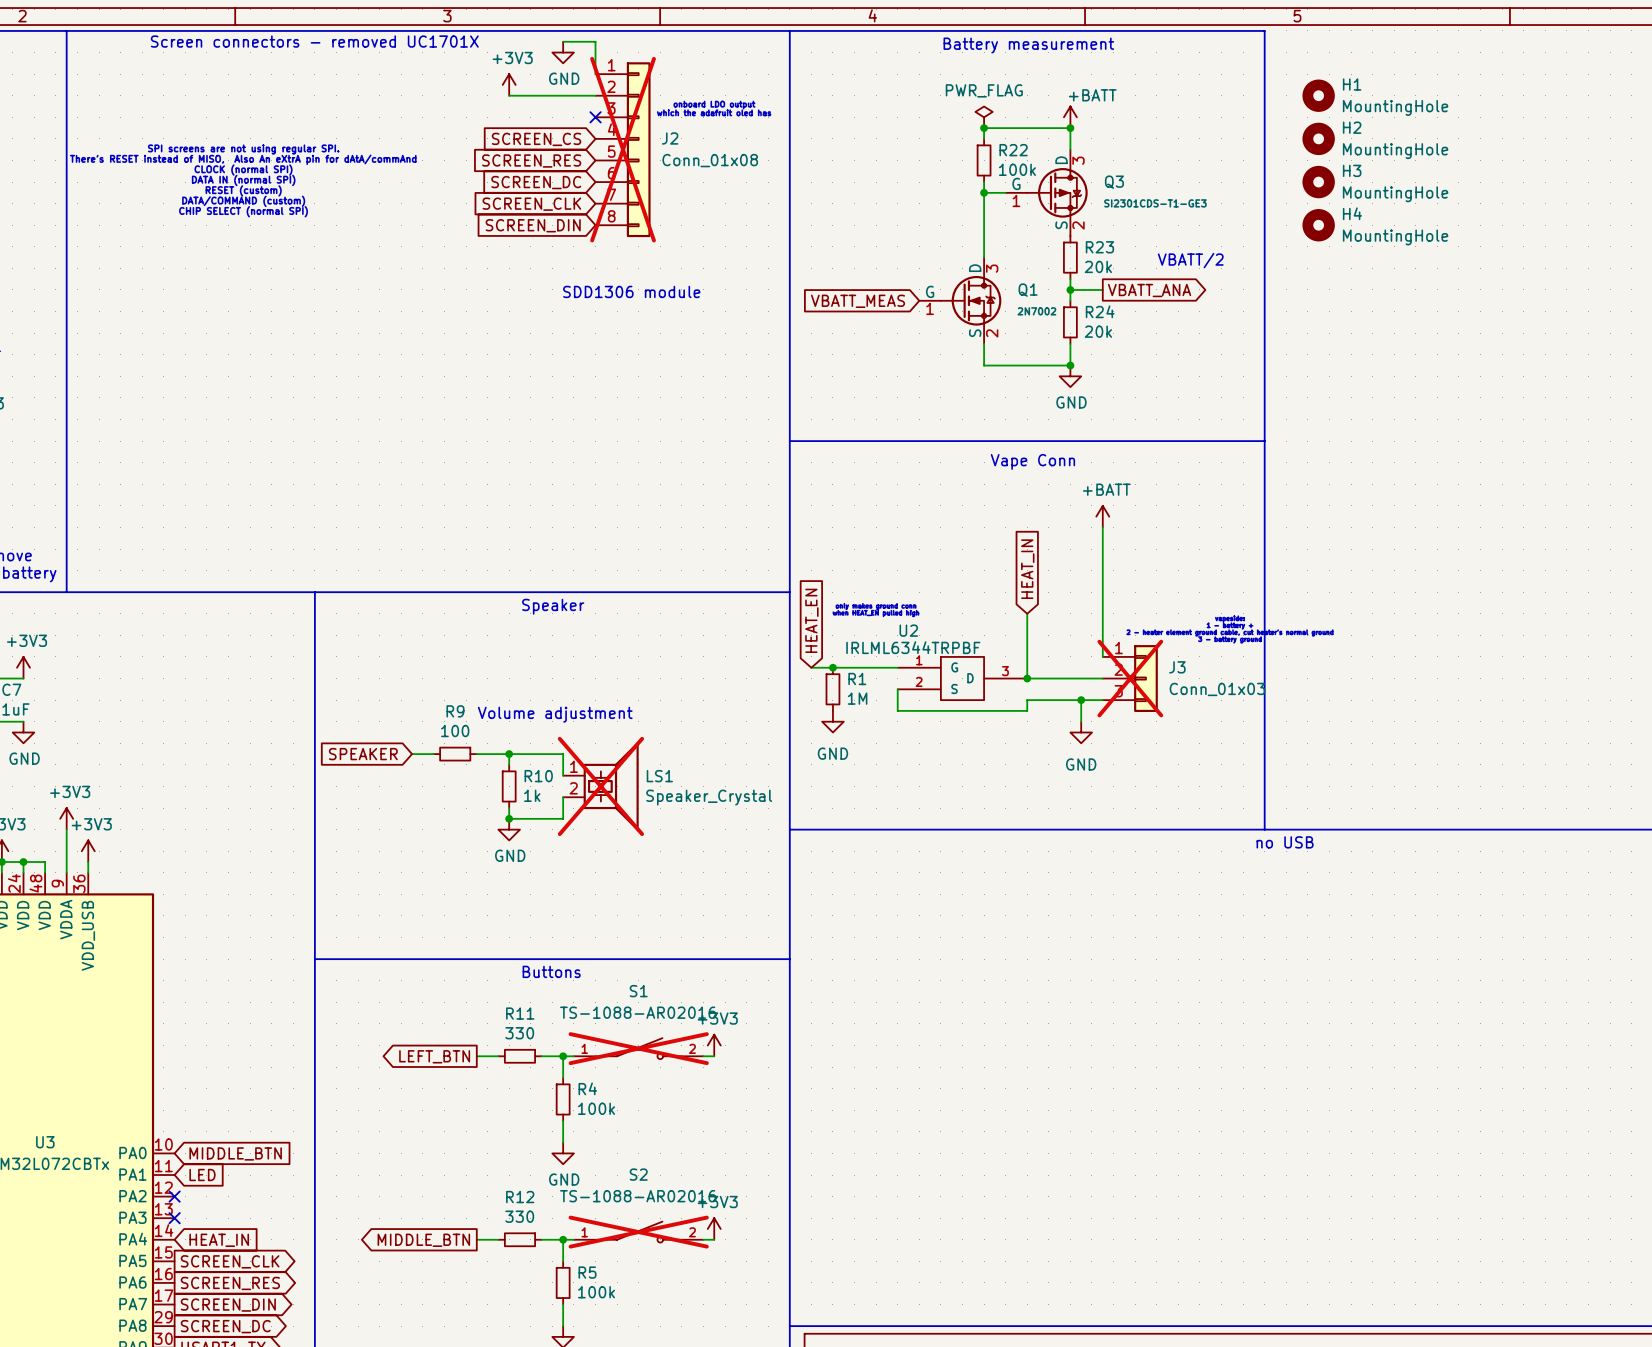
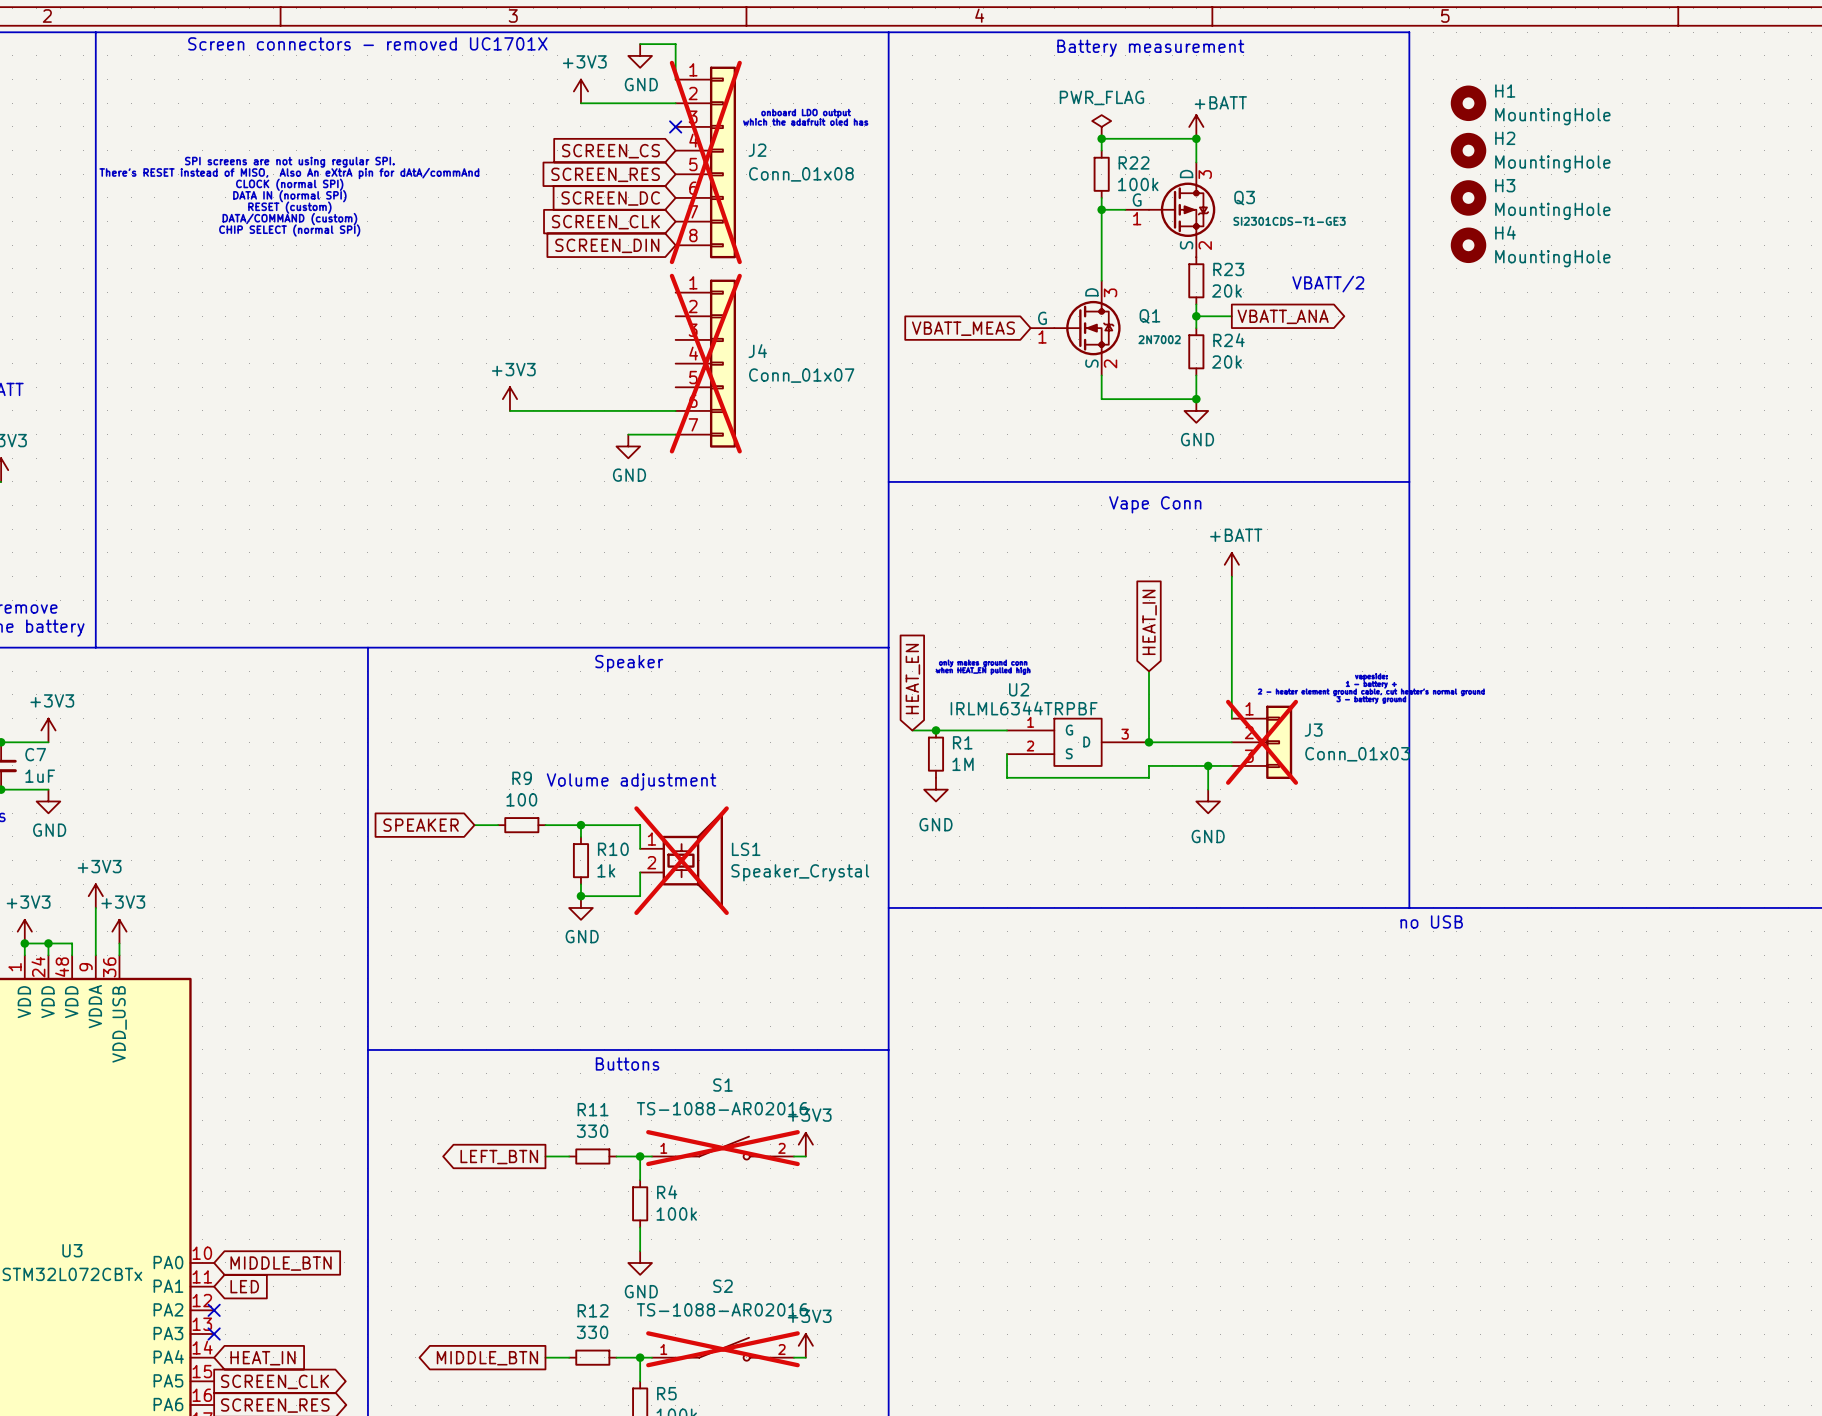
text: SDD1306 module (631, 291) -> none
J4: none -> Conn_01x07 (705, 363)
power symbol: none -> +3V3 (509, 399)
wire: none -> (509, 410) (675, 410)
wire: none -> (628, 434) (675, 434)
power symbol: none -> GND (628, 446)

